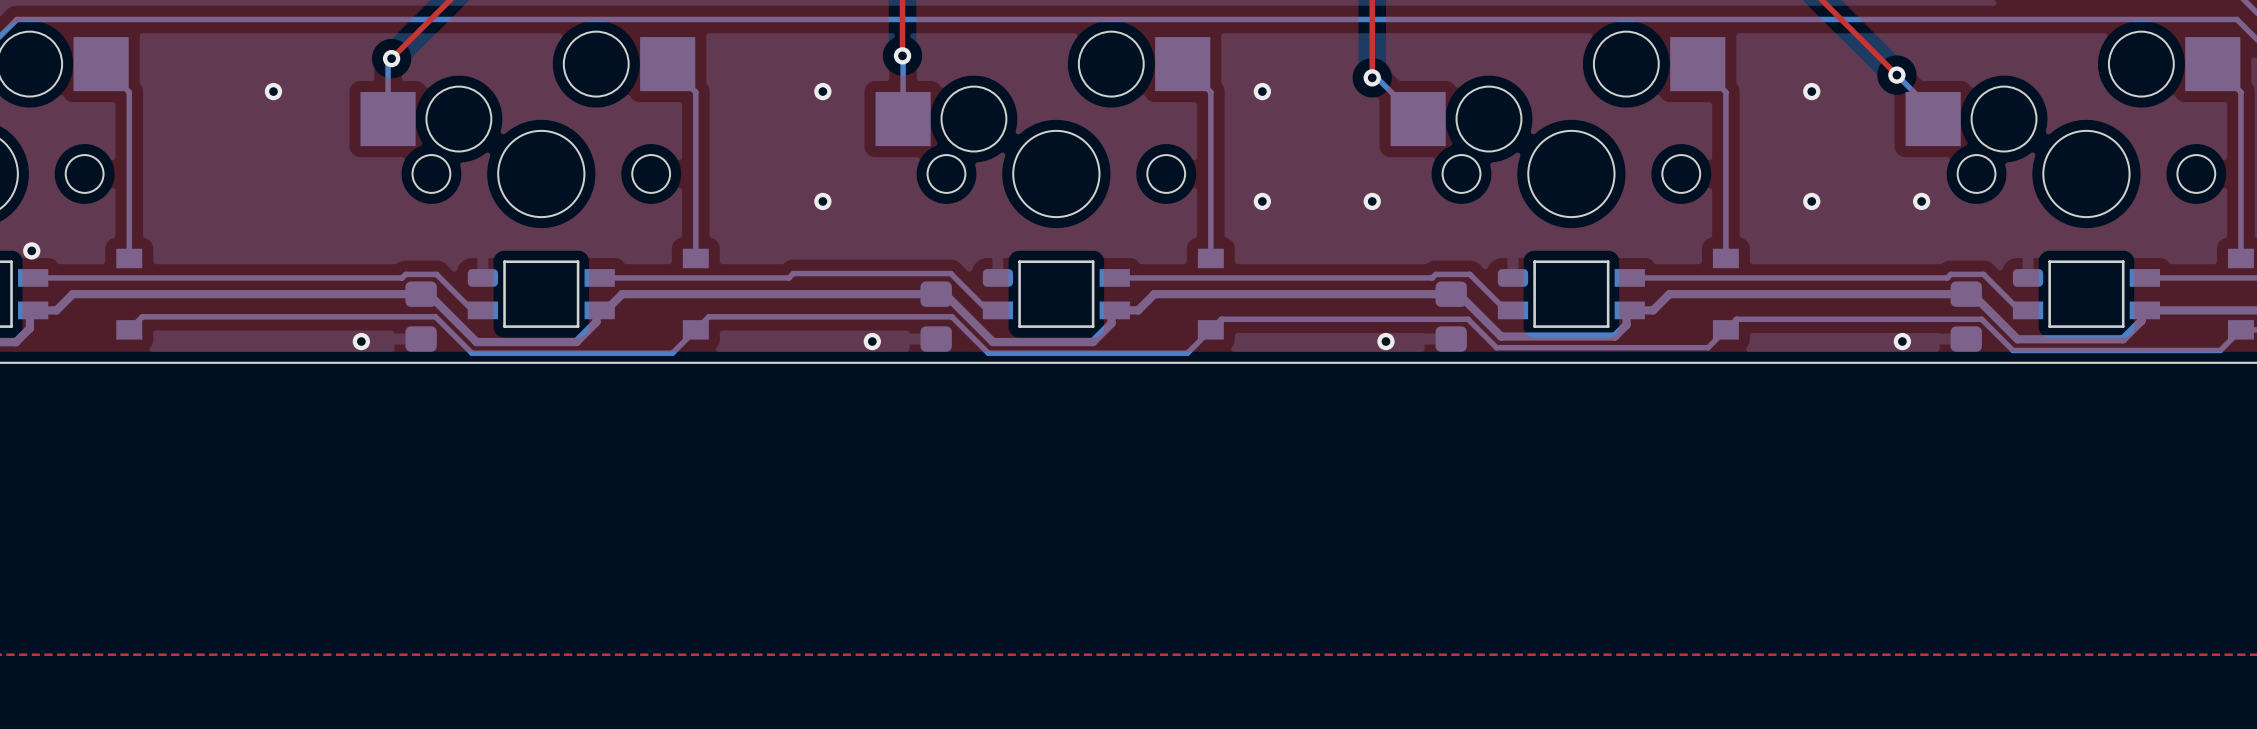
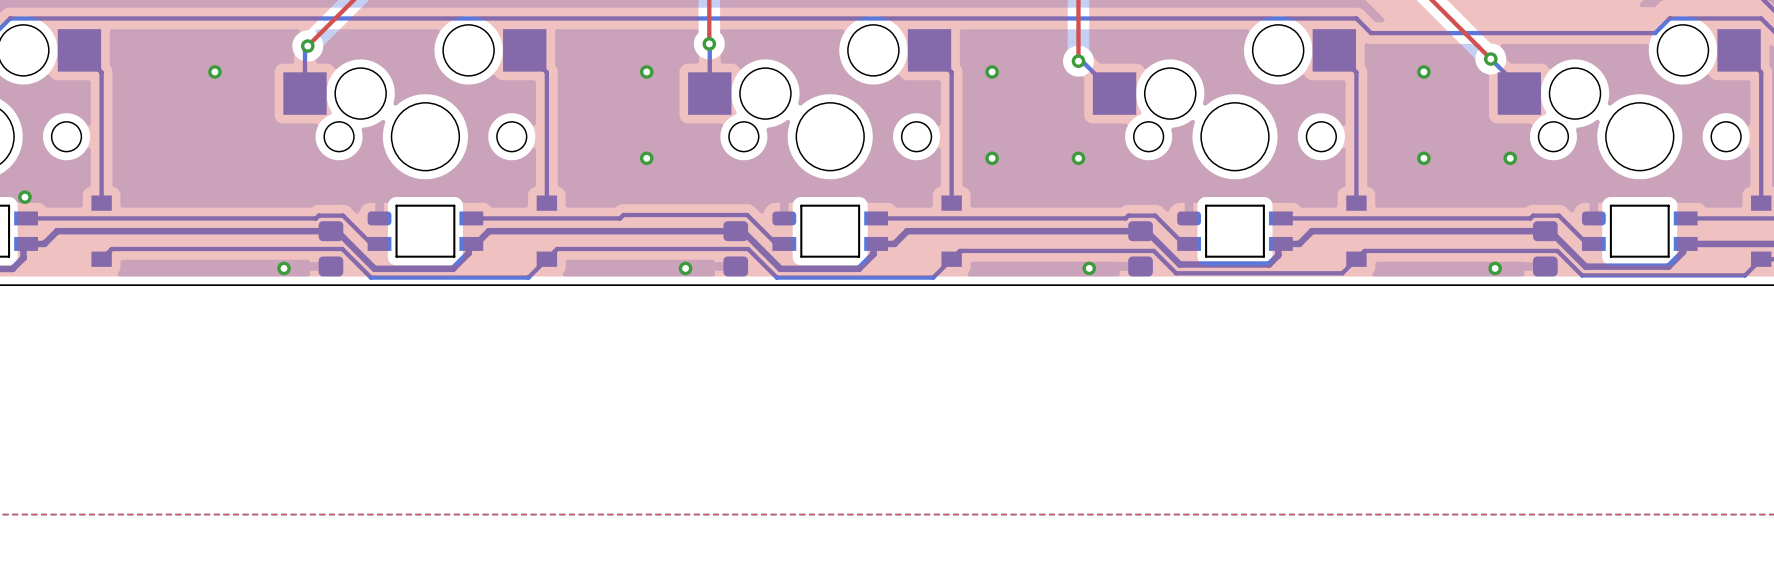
bottom track: (12, 23) (16, 19) (2236, 19) (2240, 23) -> (10, 18) (1356, 18) (1371, 33) (1655, 33) (1669, 18) (1761, 18)

